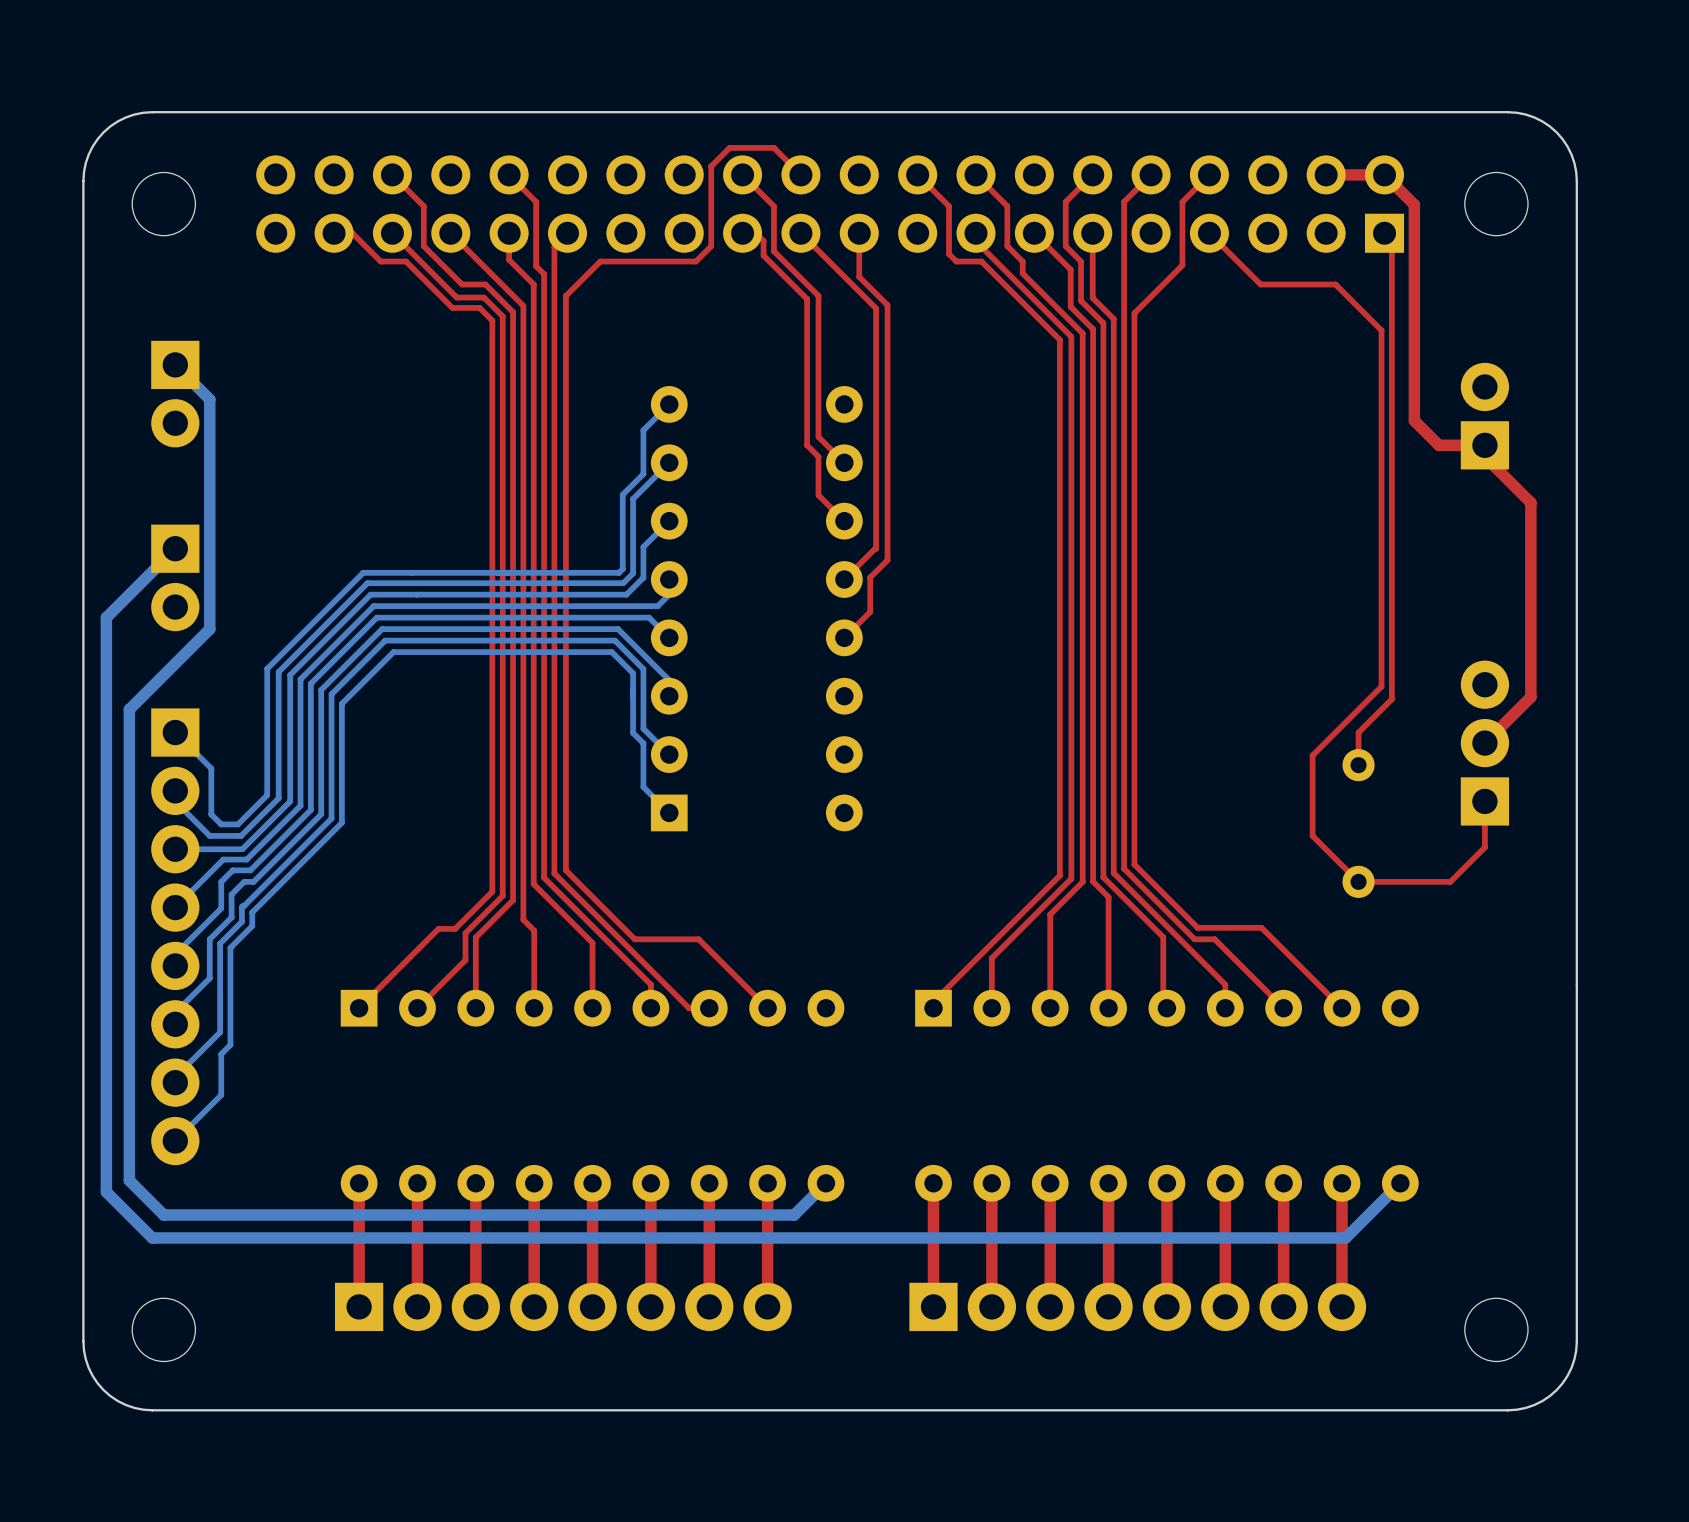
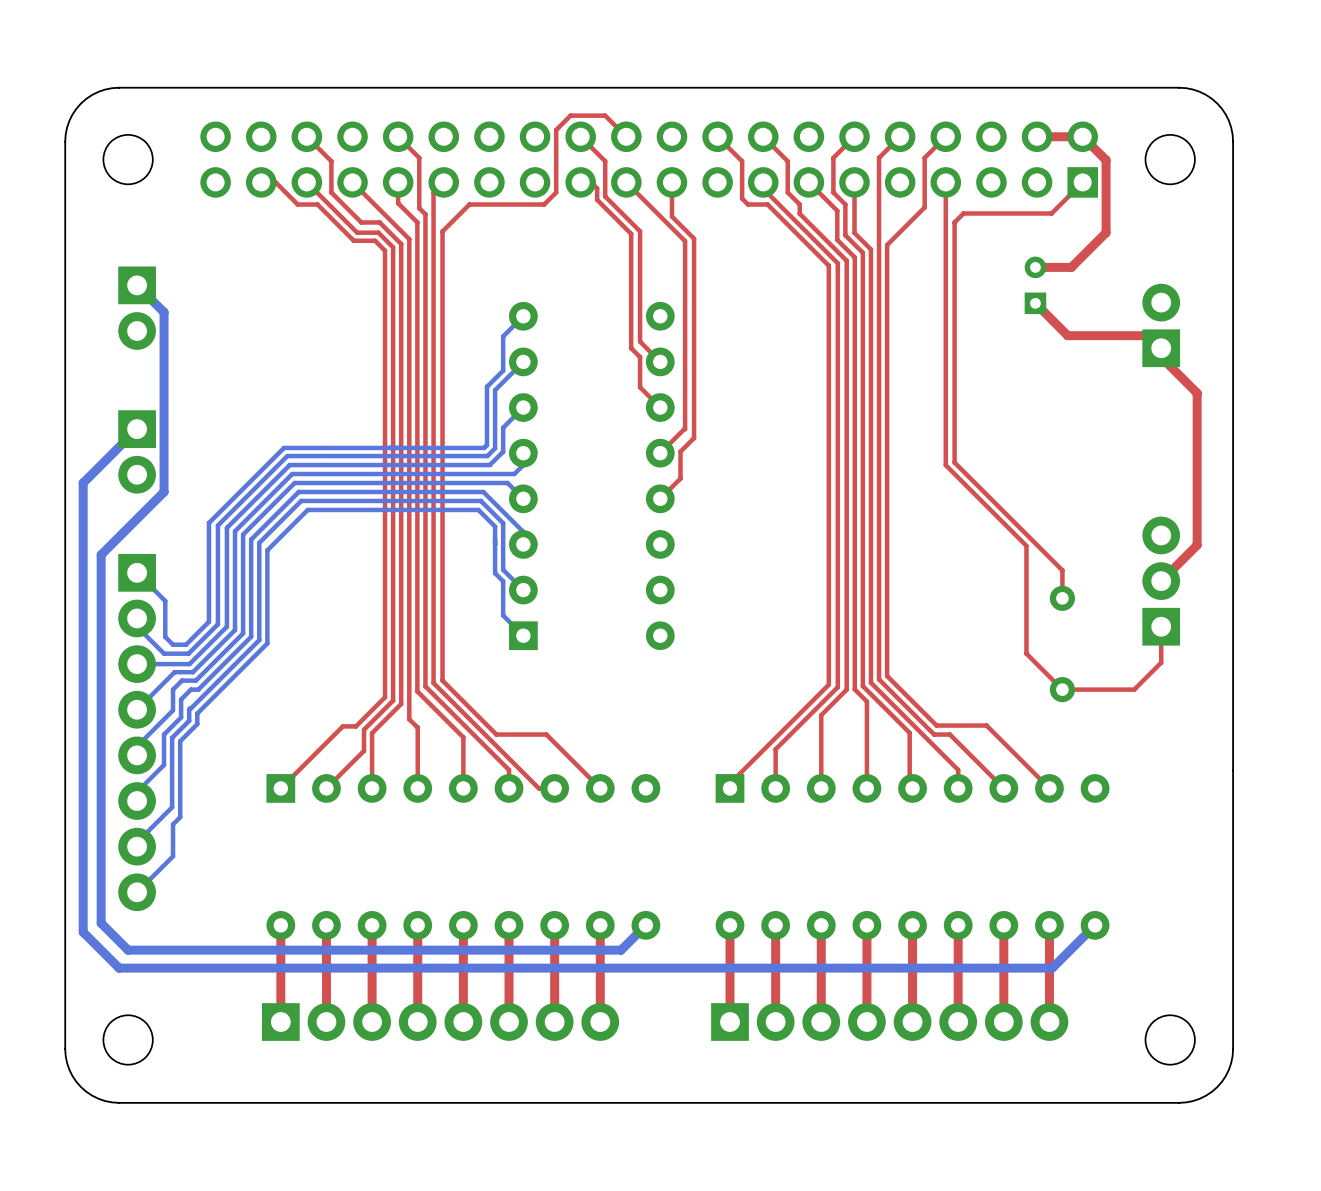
top track: (1209, 233) (1260, 284) (1335, 284) (1381, 330) (1381, 686) (1312, 755) -> (945, 182) (945, 465) (1026, 545) (1026, 590)
top track: (1391, 240) (1391, 699) (1358, 732) -> (1082, 182) (1051, 213) (963, 213) (954, 222) (954, 462) (1062, 570) (1062, 572)
top track: (1414, 297) (1414, 420) (1438, 445) (1484, 445) -> (1106, 232) (1071, 267) (1035, 267)
part: none -> (1035, 285)
top track: none -> (1035, 303) (1067, 335) (1166, 335) (1168, 337)

